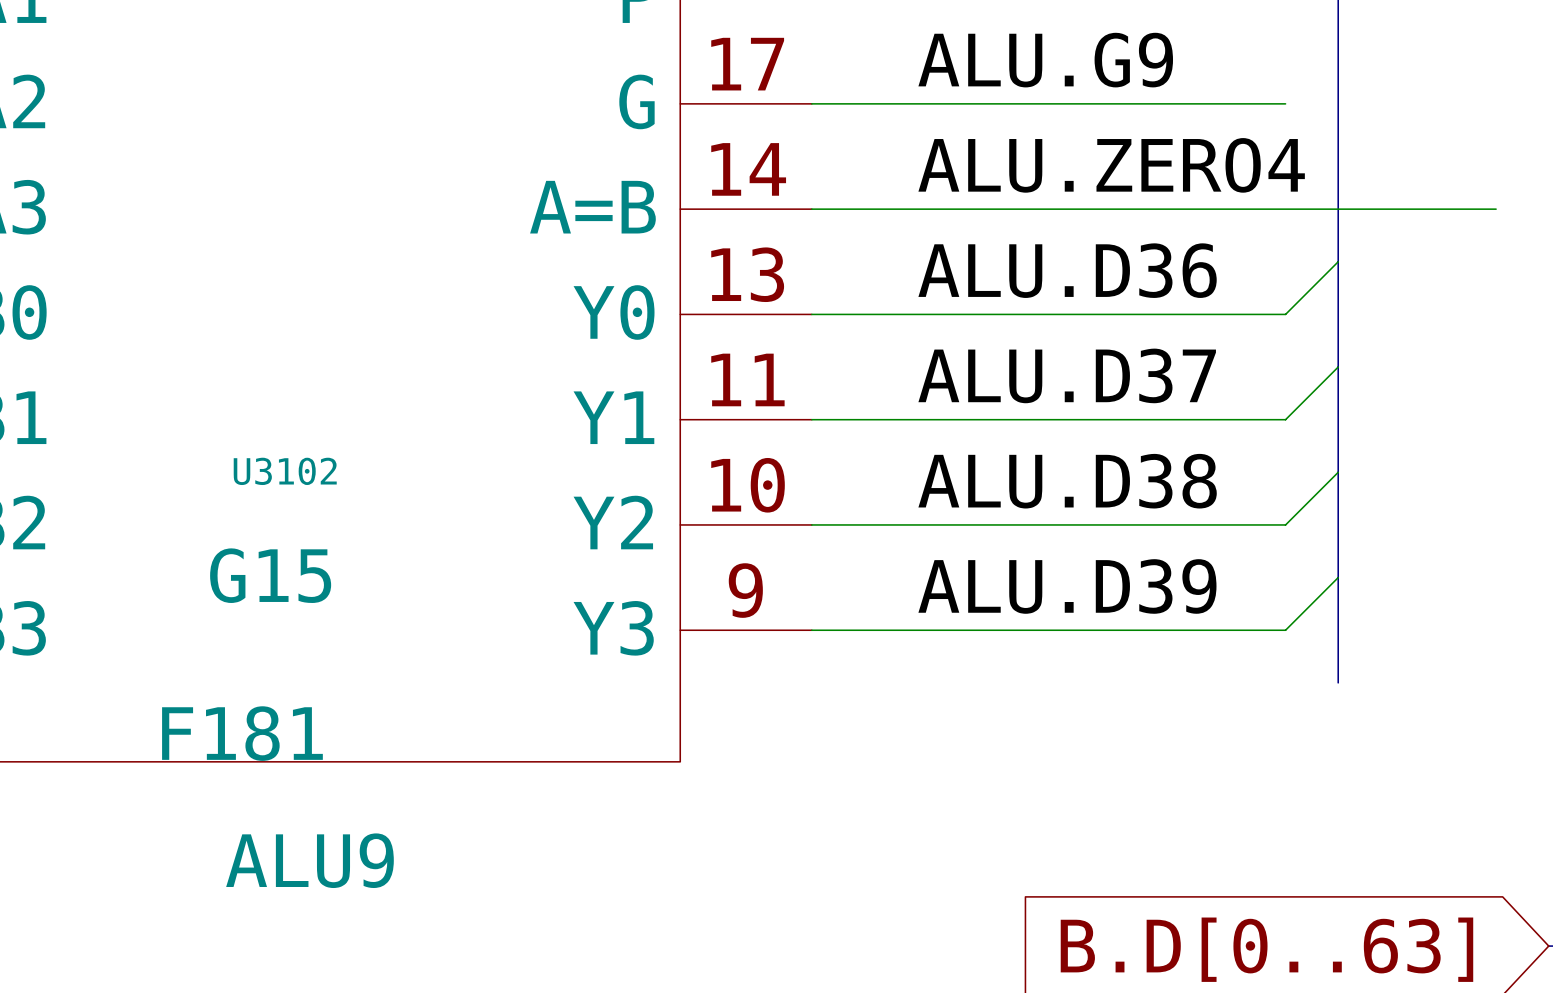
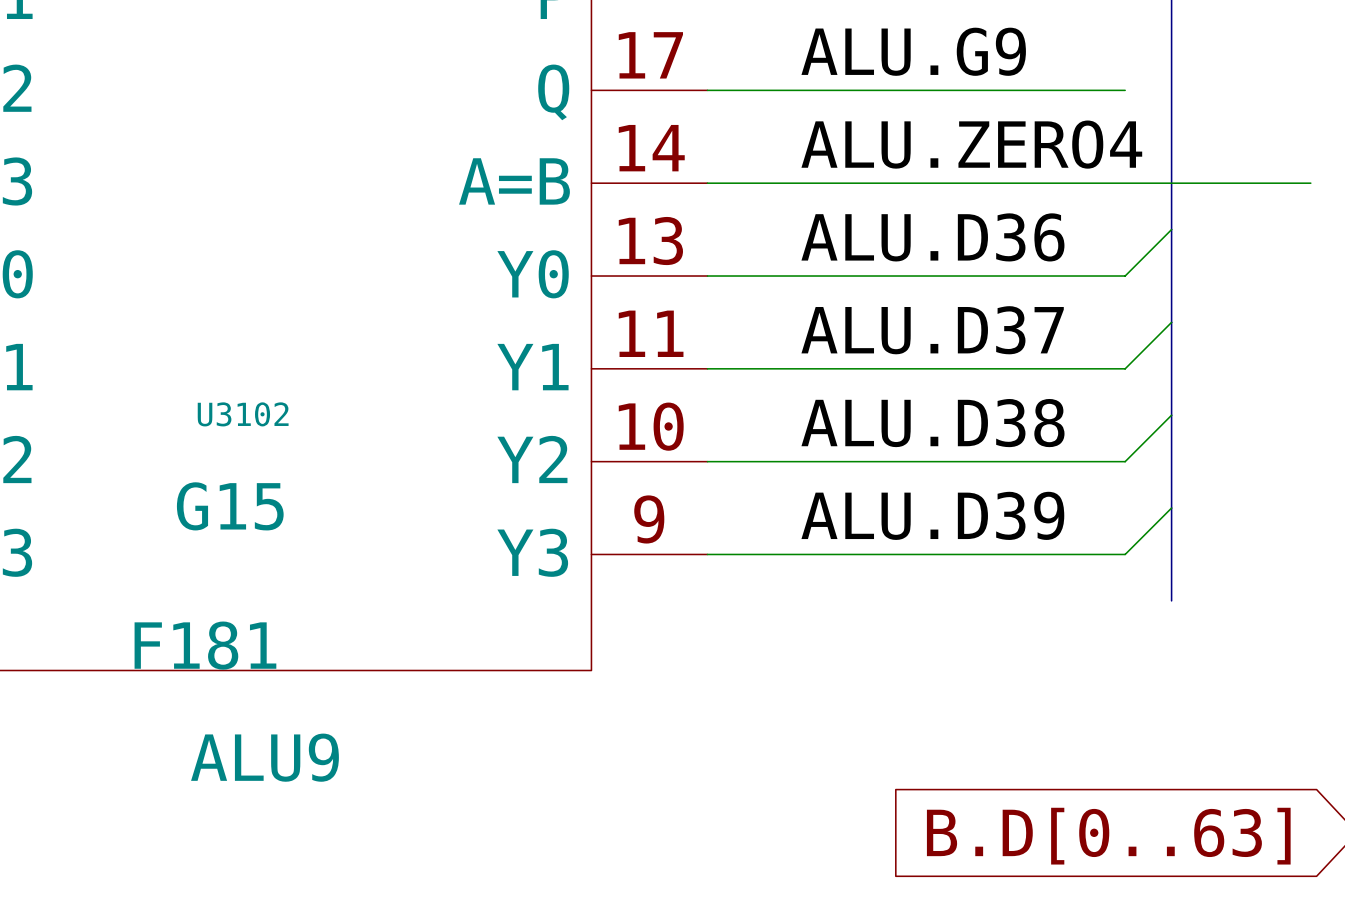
U3102 pin name: G (636, 101) -> Q (553, 92)

